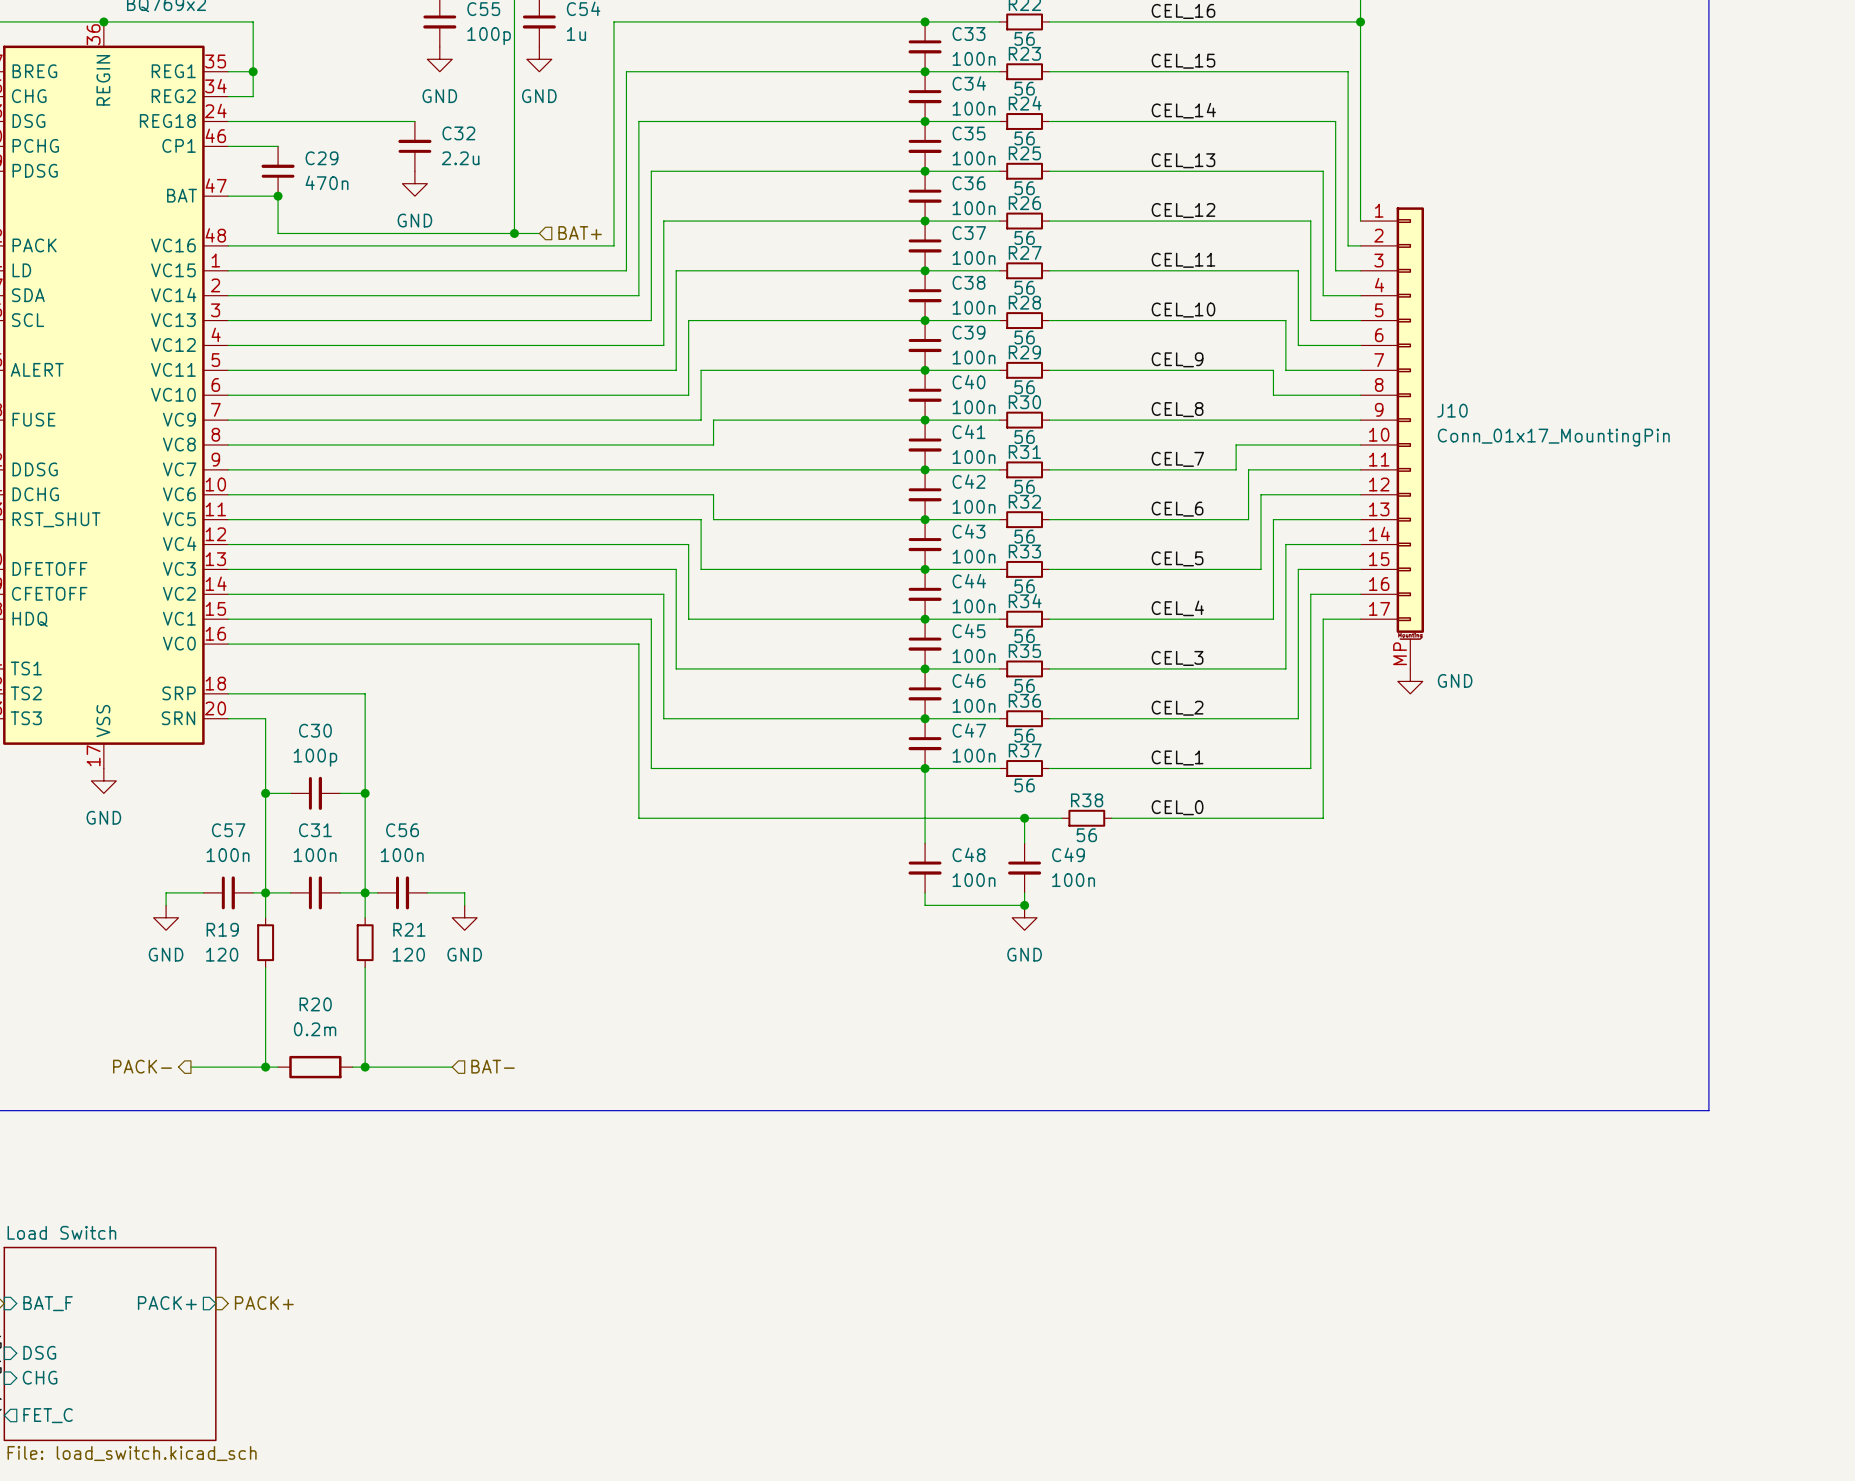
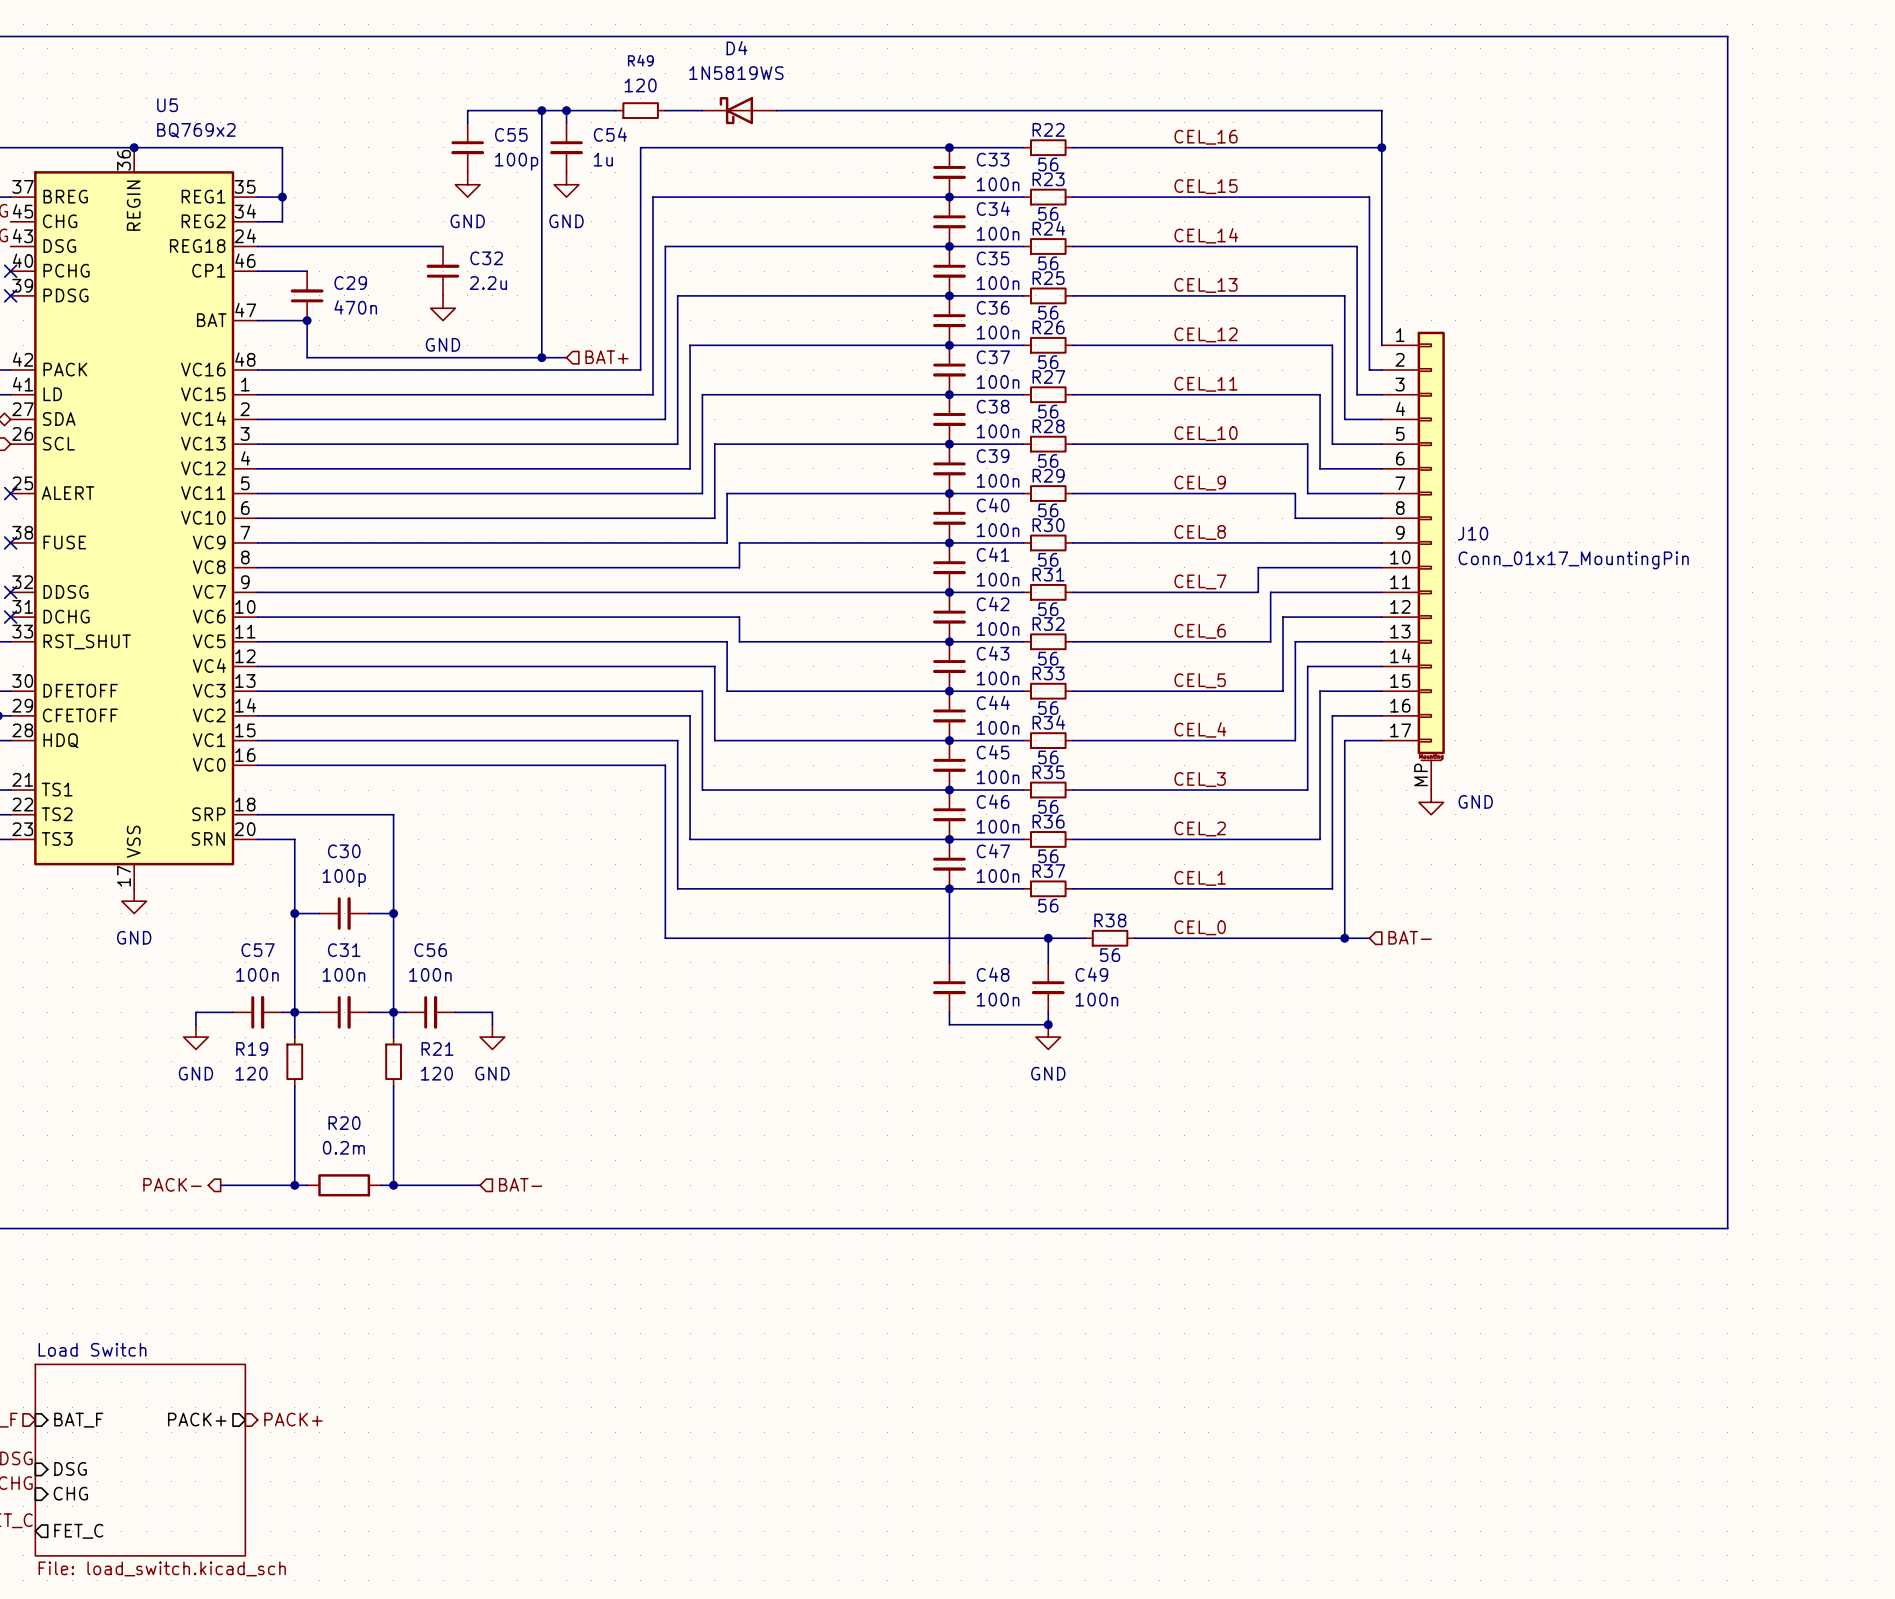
hierarchical label: none -> BAT- (1409, 937)
wire: none -> (1344, 938) (1369, 938)
junction: none -> (1344, 938)

